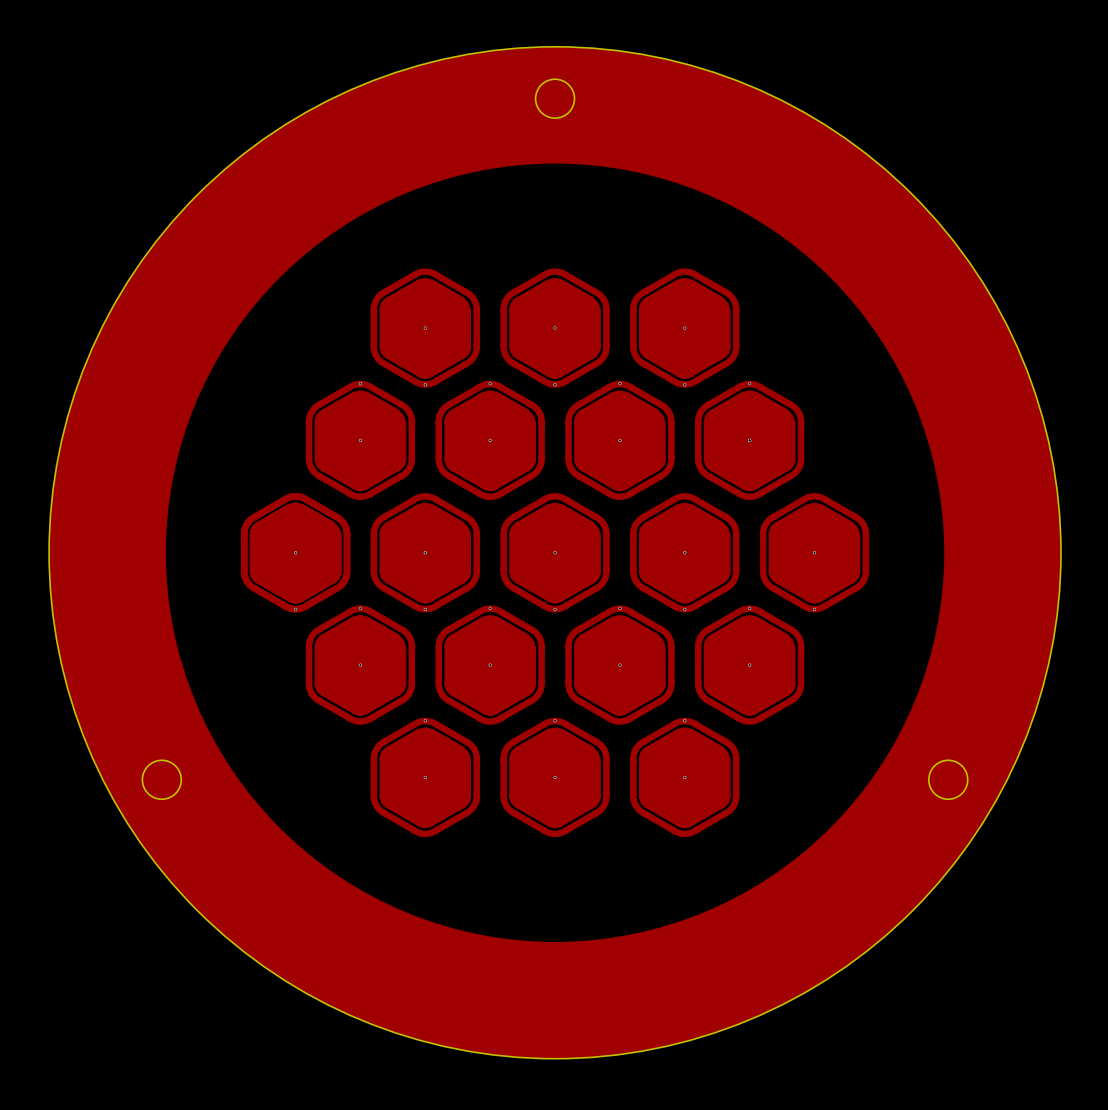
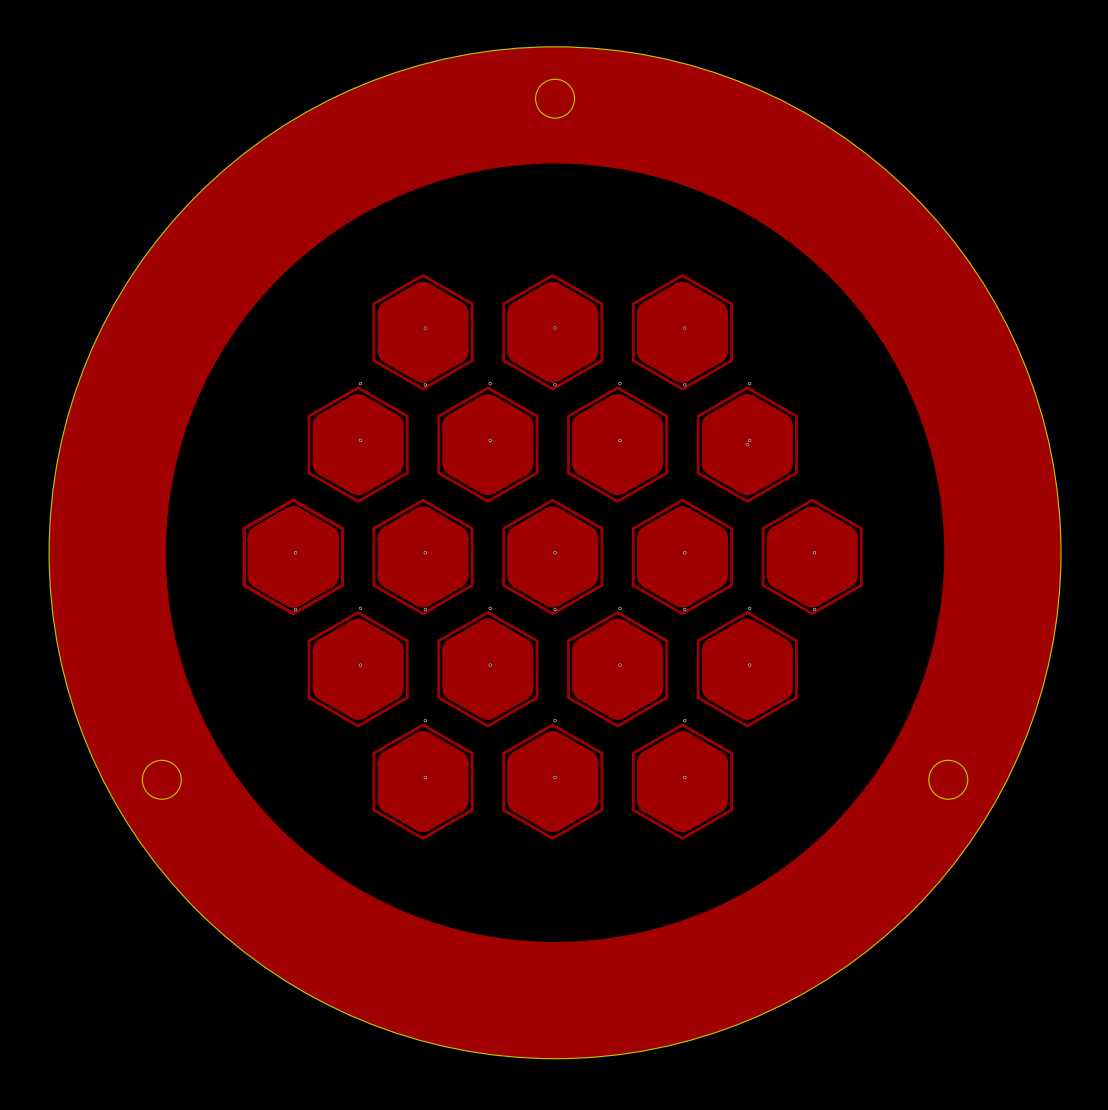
drawing shape: [370, 268, 481, 388] -> [372, 273, 474, 391]
drawing shape: [500, 268, 610, 388] -> [502, 273, 604, 391]
drawing shape: [630, 268, 740, 388] -> [631, 273, 734, 391]
drawing shape: [305, 380, 416, 501] -> [307, 386, 409, 503]
drawing shape: [435, 380, 545, 501] -> [437, 386, 539, 503]
drawing shape: [565, 380, 675, 501] -> [567, 386, 669, 503]
drawing shape: [694, 380, 805, 501] -> [696, 386, 798, 503]
via: none -> (747, 444)
drawing shape: [240, 493, 351, 613] -> [242, 498, 344, 616]
drawing shape: [370, 493, 481, 613] -> [372, 498, 474, 616]
drawing shape: [500, 493, 610, 613] -> [502, 498, 604, 616]
drawing shape: [630, 493, 740, 613] -> [631, 498, 734, 616]
drawing shape: [759, 493, 870, 613] -> [761, 498, 863, 616]
drawing shape: [305, 605, 416, 725] -> [307, 610, 409, 728]
drawing shape: [435, 605, 545, 725] -> [437, 610, 539, 728]
drawing shape: [565, 605, 675, 725] -> [567, 610, 669, 728]
drawing shape: [694, 605, 805, 725] -> [696, 610, 798, 728]
drawing shape: [370, 717, 481, 838] -> [372, 723, 474, 841]
drawing shape: [500, 717, 610, 838] -> [502, 723, 604, 841]
drawing shape: [630, 717, 740, 838] -> [631, 723, 734, 841]

